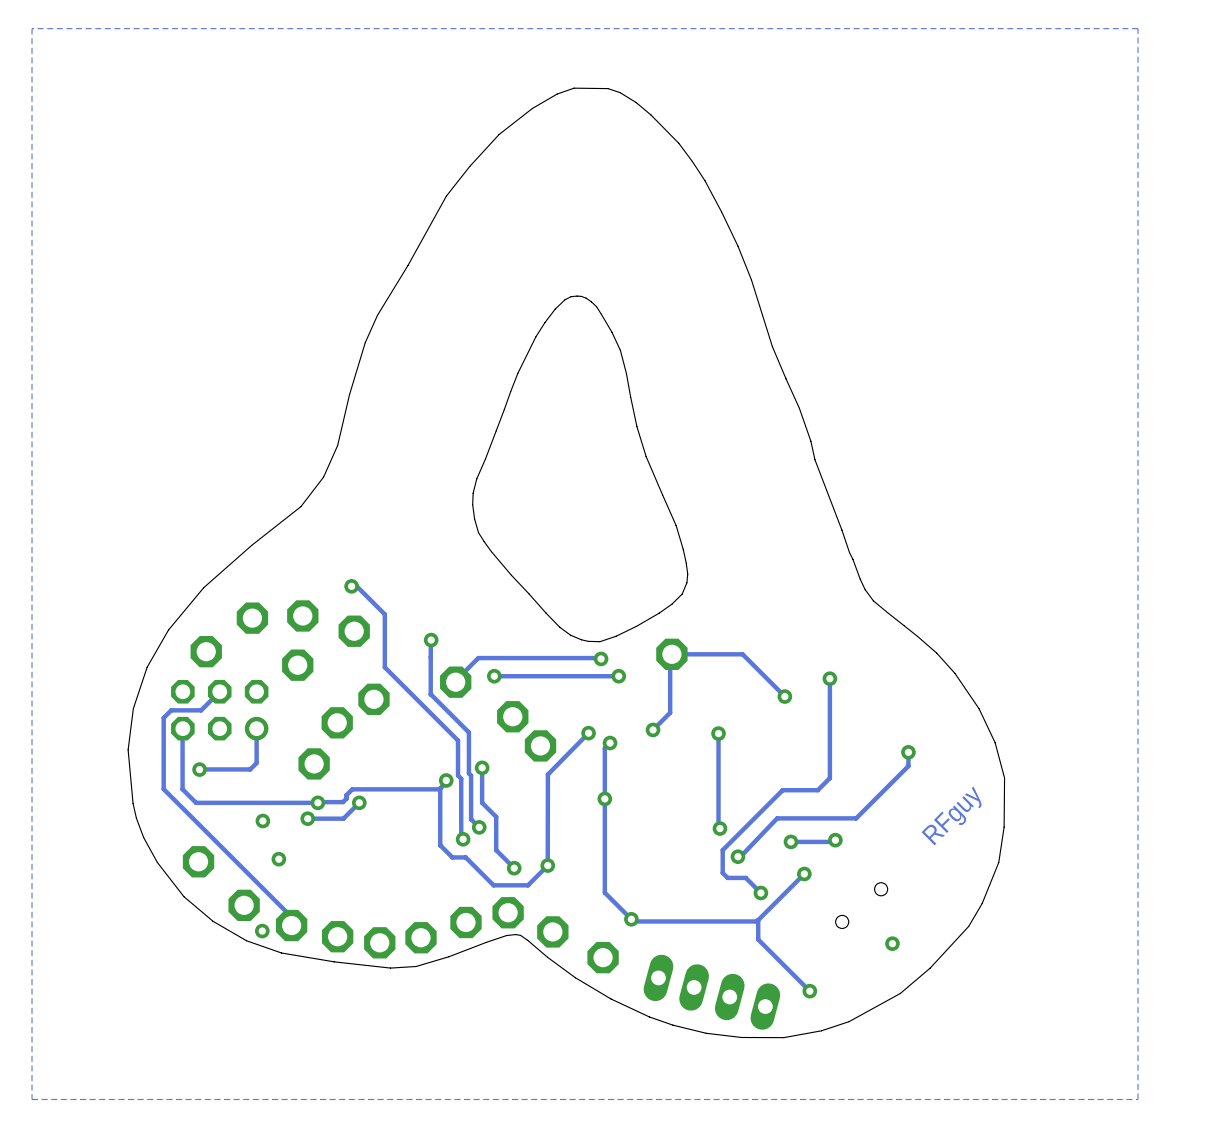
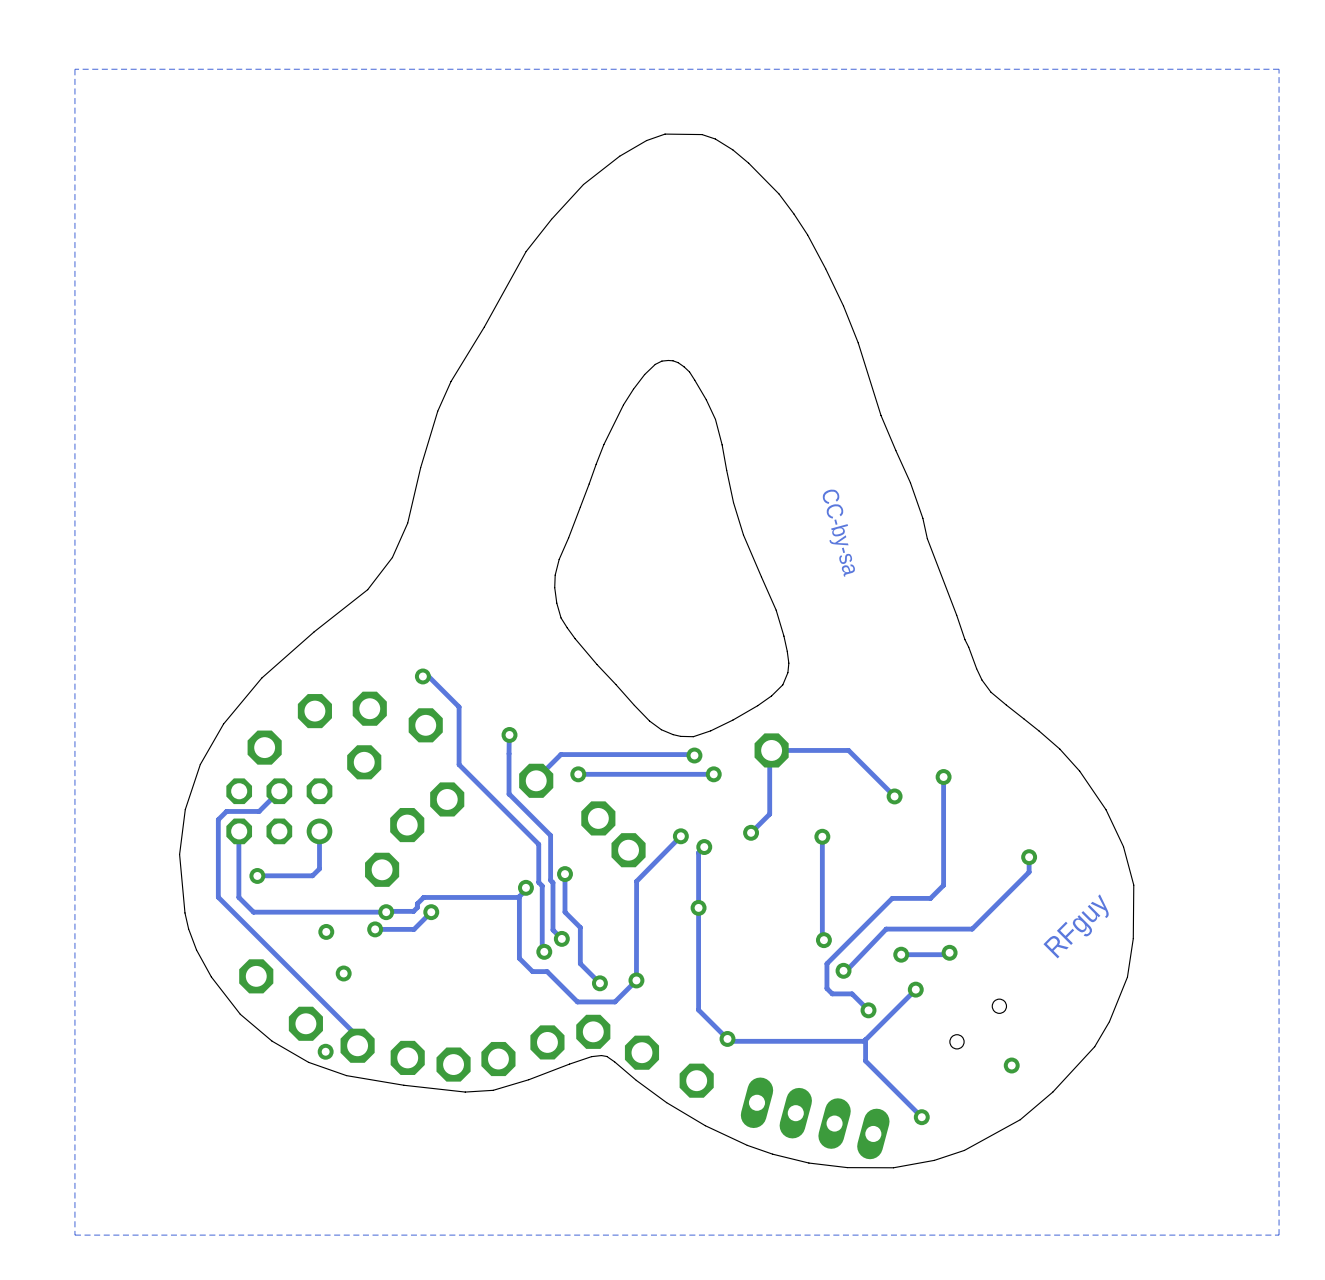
text: none -> CC-by-sa (838, 532)

